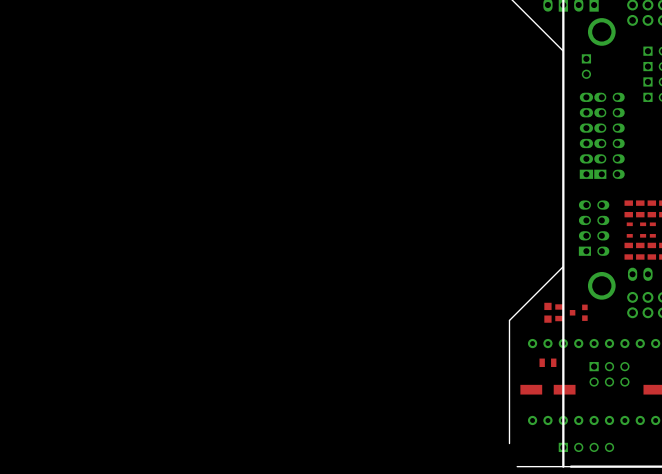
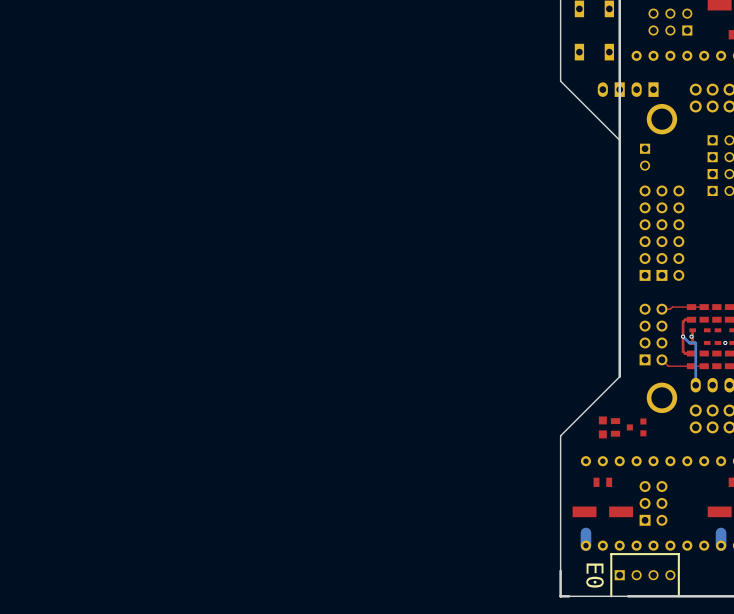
part footprint: [579, 92, 594, 179] -> [639, 185, 651, 281]
part footprint: [594, 92, 625, 179] -> [656, 185, 685, 281]
part footprint: [578, 200, 610, 256] -> [639, 303, 668, 366]
top track: none -> (704, 307) (672, 307) (670, 309) (661, 309)
top track: none -> (691, 319) (685, 319) (683, 321) (683, 351) (685, 353) (691, 353)
top track: none -> (692, 330) (692, 342)
bottom track: none -> (683, 336) (689, 342) (695, 342) (695, 385)
via: none -> (683, 336)
via: none -> (691, 336)
via: none -> (725, 342)
top track: none -> (661, 359) (668, 366) (704, 366)
board edge: (563, 266) (563, 466) -> none
part: (609, 374) -> none
part: none -> (653, 503)
bottom track: none -> (585, 532) (585, 545)
bottom track: none -> (721, 532) (721, 545)
board edge: none -> (560, 570) (560, 596) (569, 596)
text: none -> E0 (595, 575)
line: none -> (678, 596) (678, 554) (611, 554) (611, 596)

